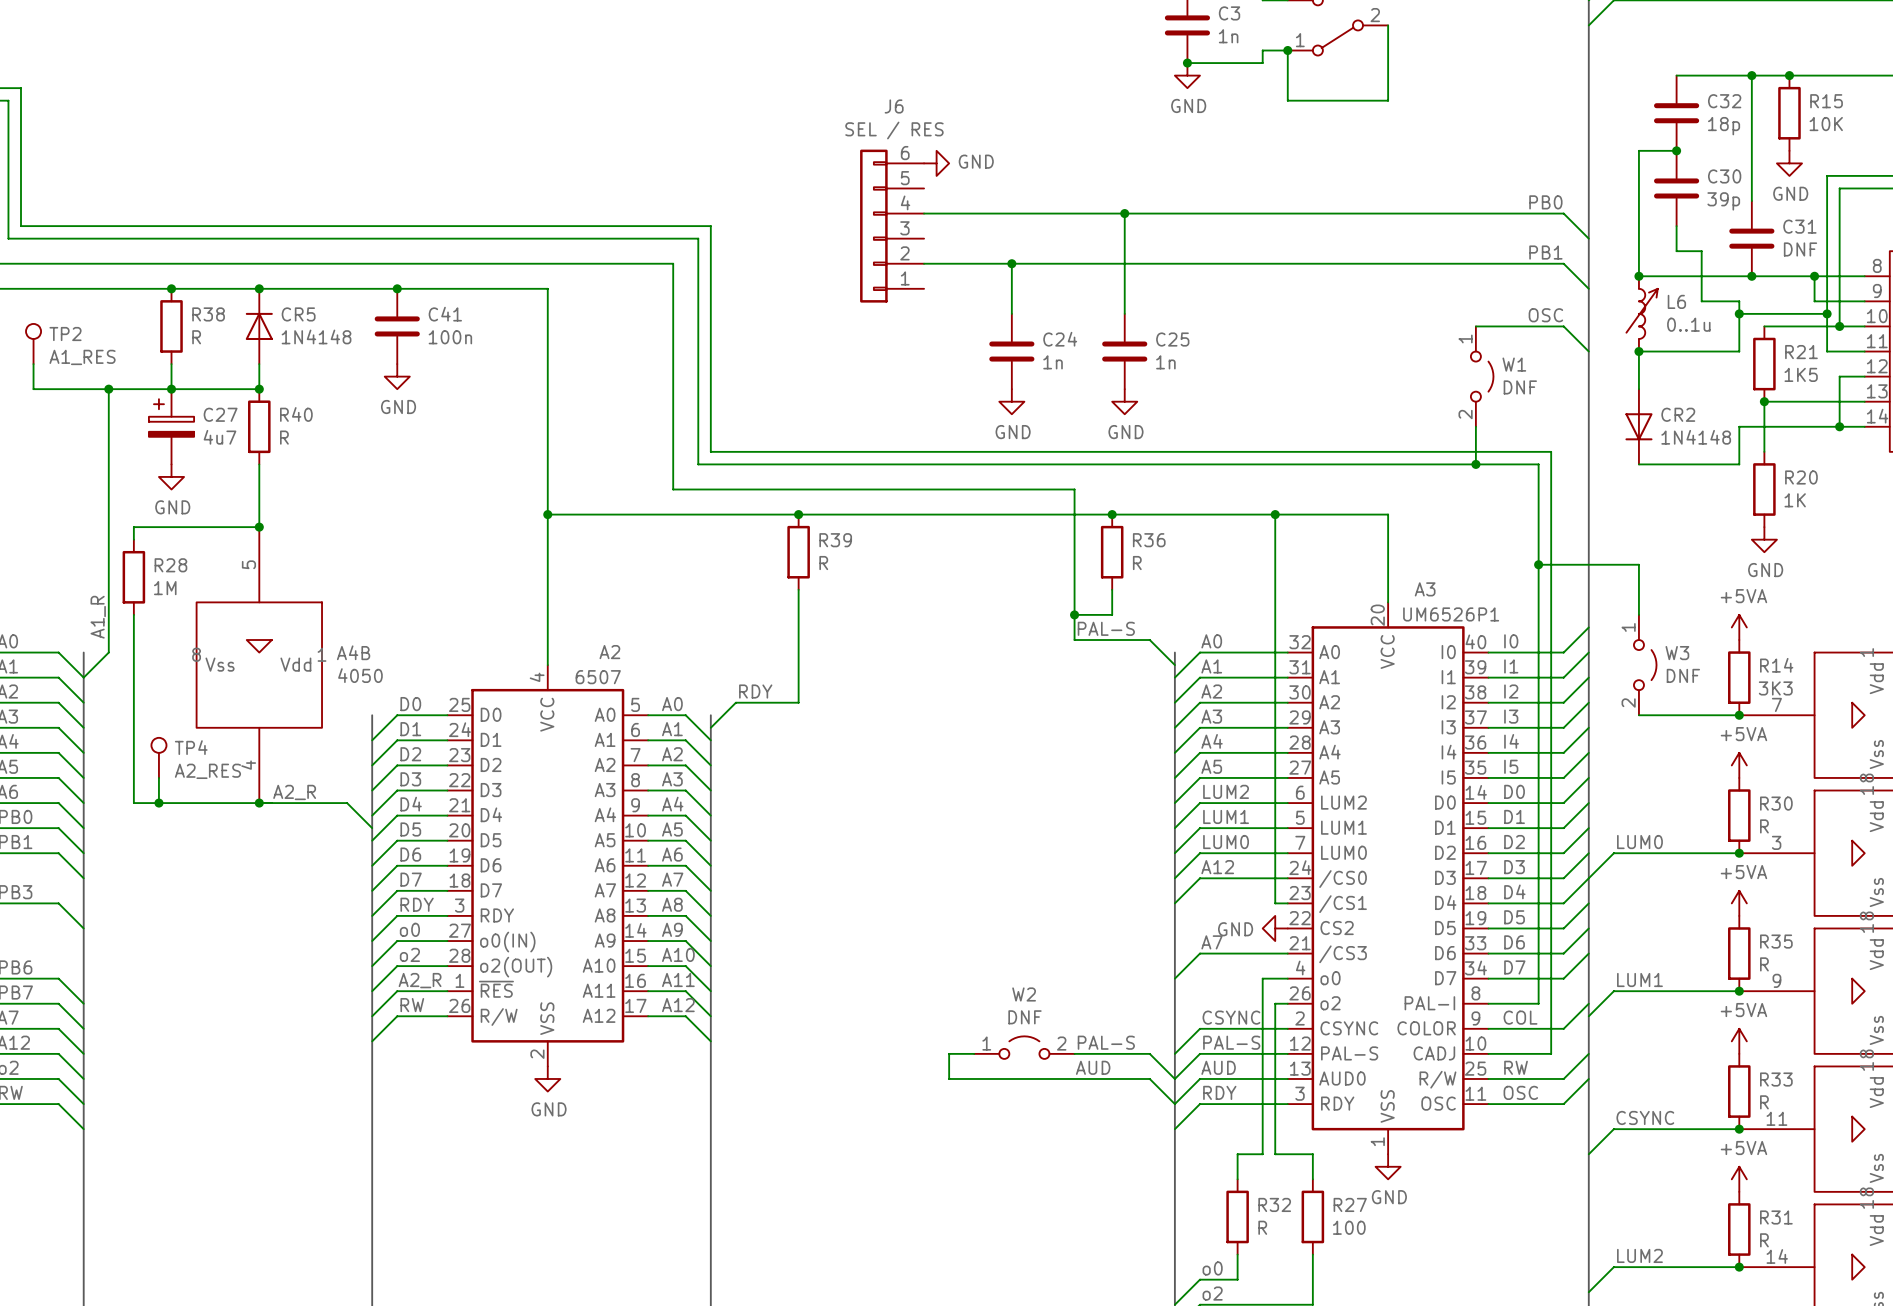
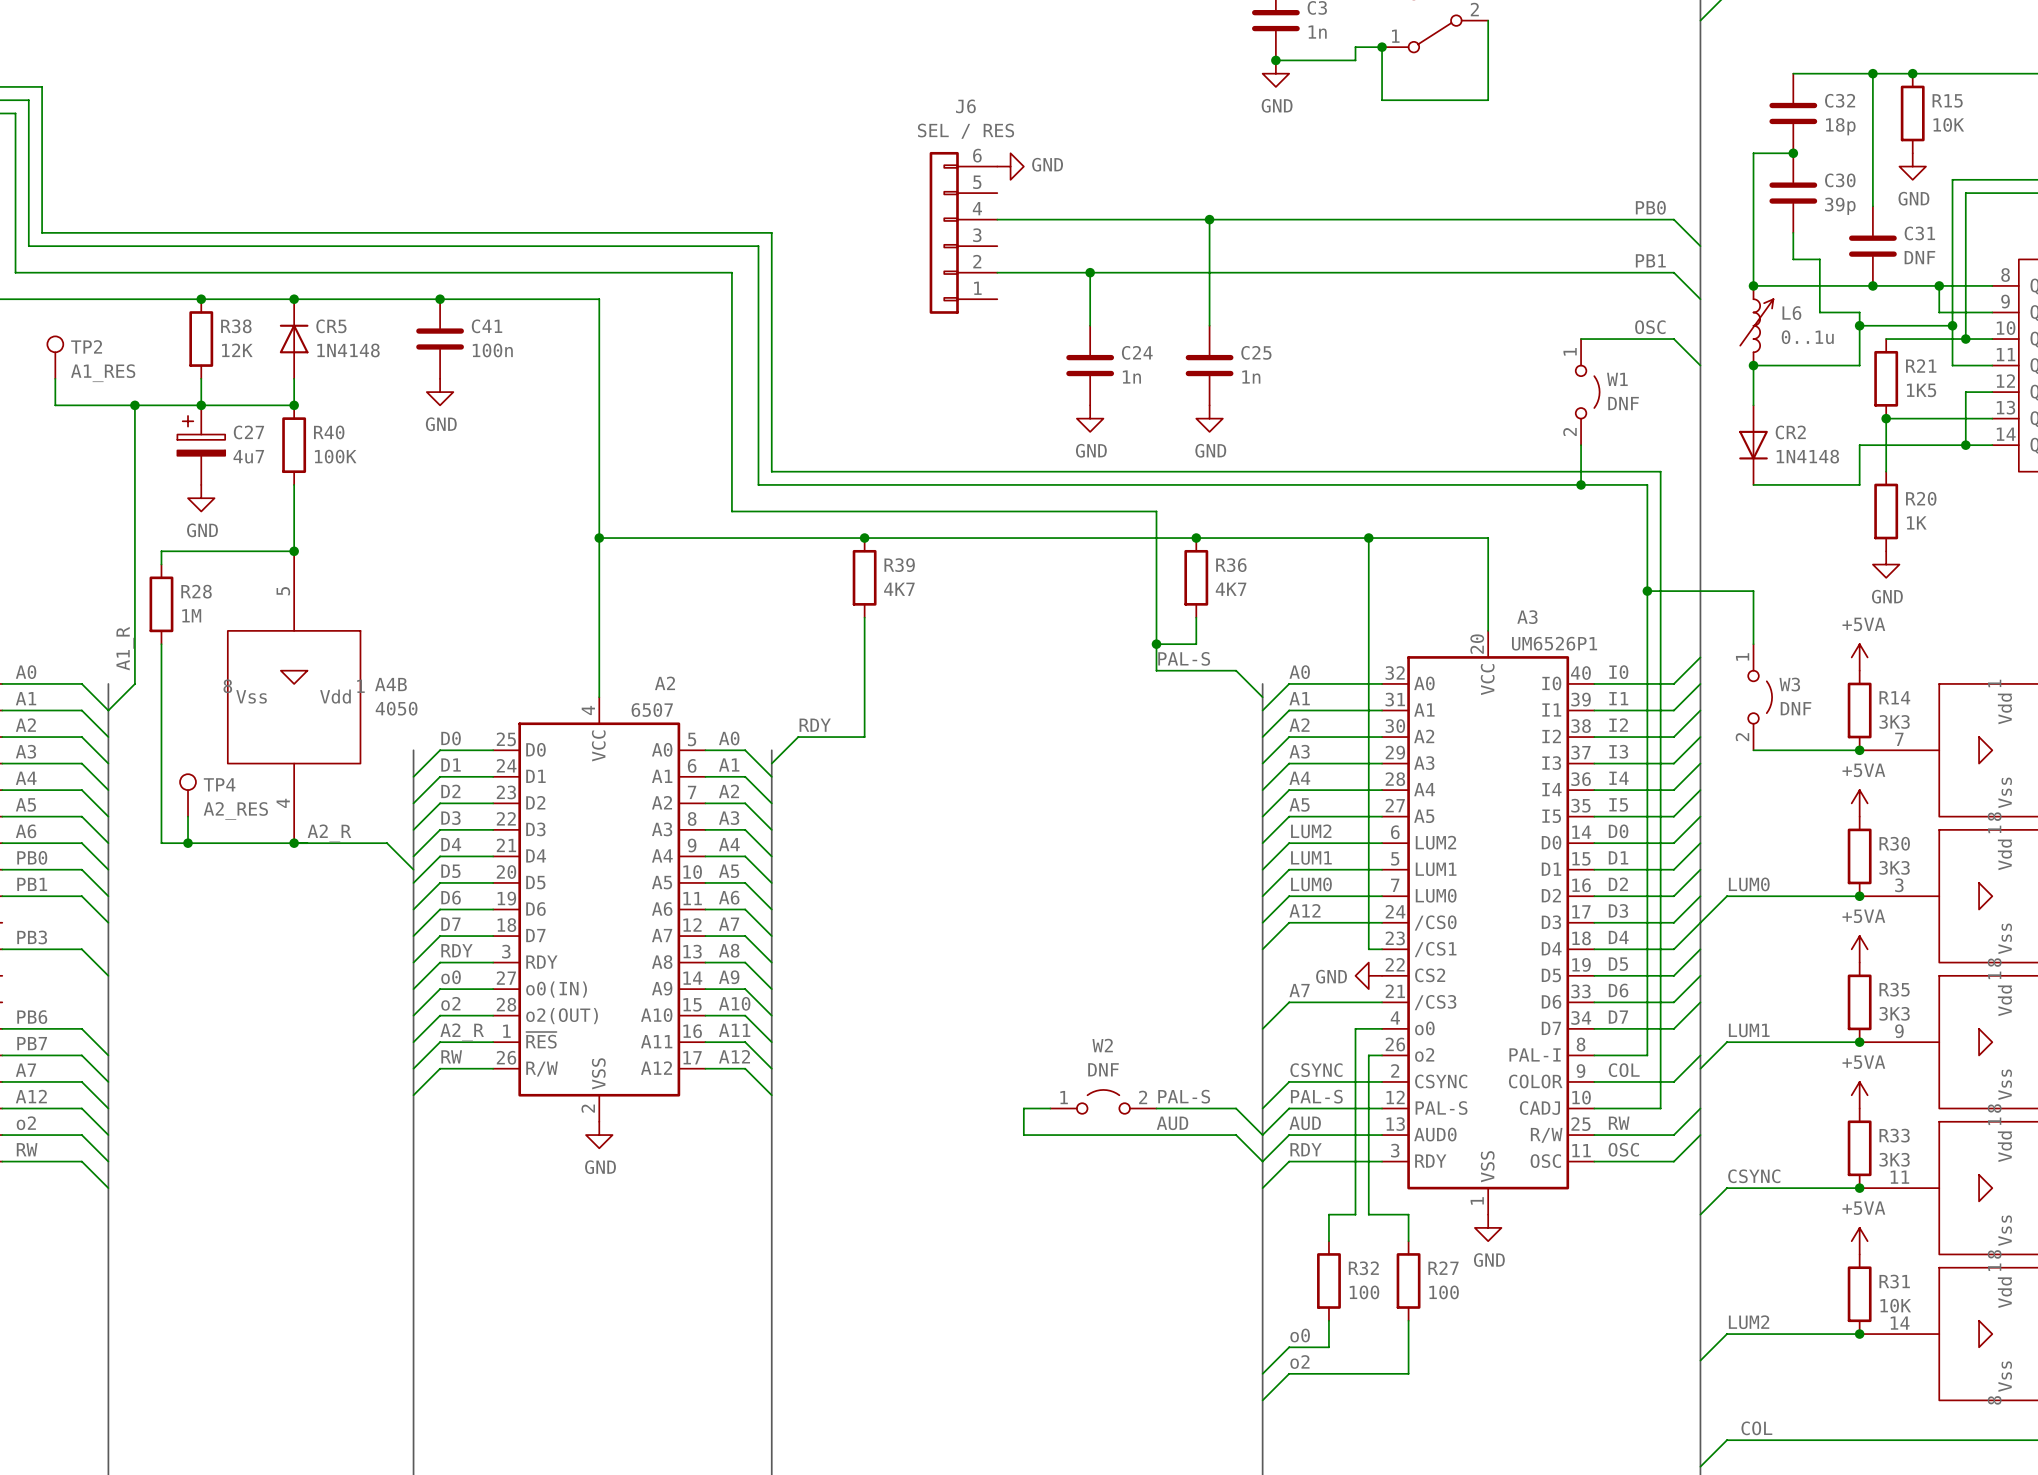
R38 value: R (196, 337) -> 12K (237, 350)
R40 value: R (284, 437) -> 100K (335, 456)
R39 value: R (823, 563) -> 4K7 (899, 589)
R36 value: R (1137, 563) -> 4K7 (1231, 589)
R30 value: R (1764, 826) -> 3K3 (1894, 867)
R35 value: R (1764, 964) -> 3K3 (1894, 1013)
R33 value: R (1764, 1102) -> 3K3 (1894, 1159)
R32 value: R (1262, 1227) -> 100 (1364, 1292)
R31 value: R (1764, 1240) -> 10K (1895, 1305)

